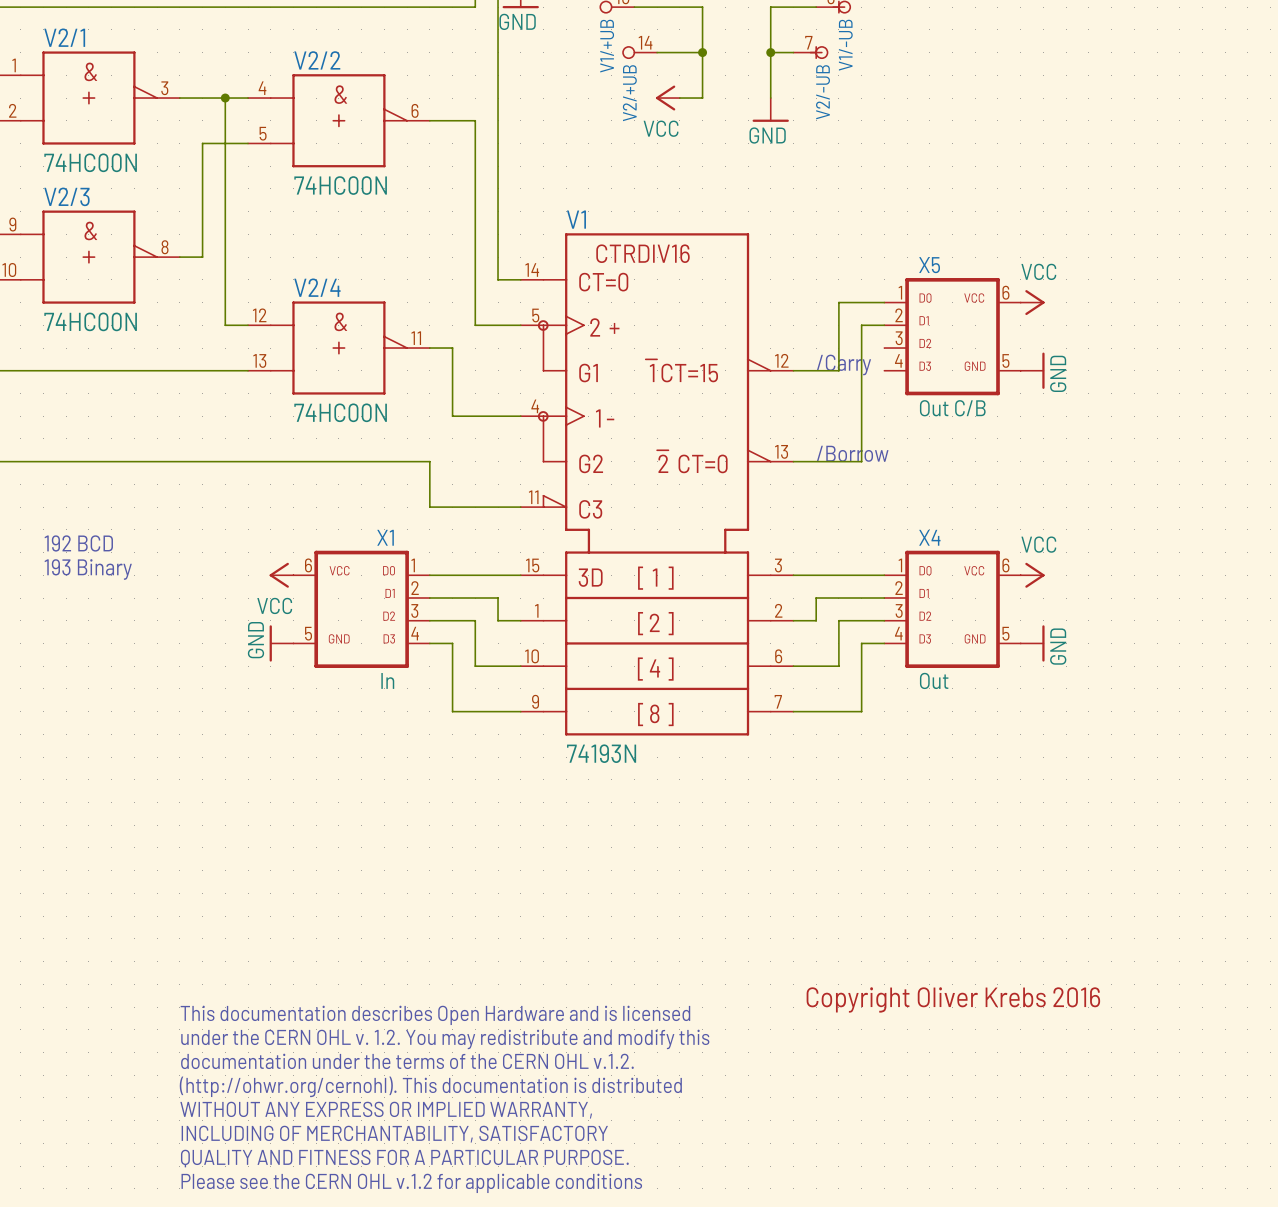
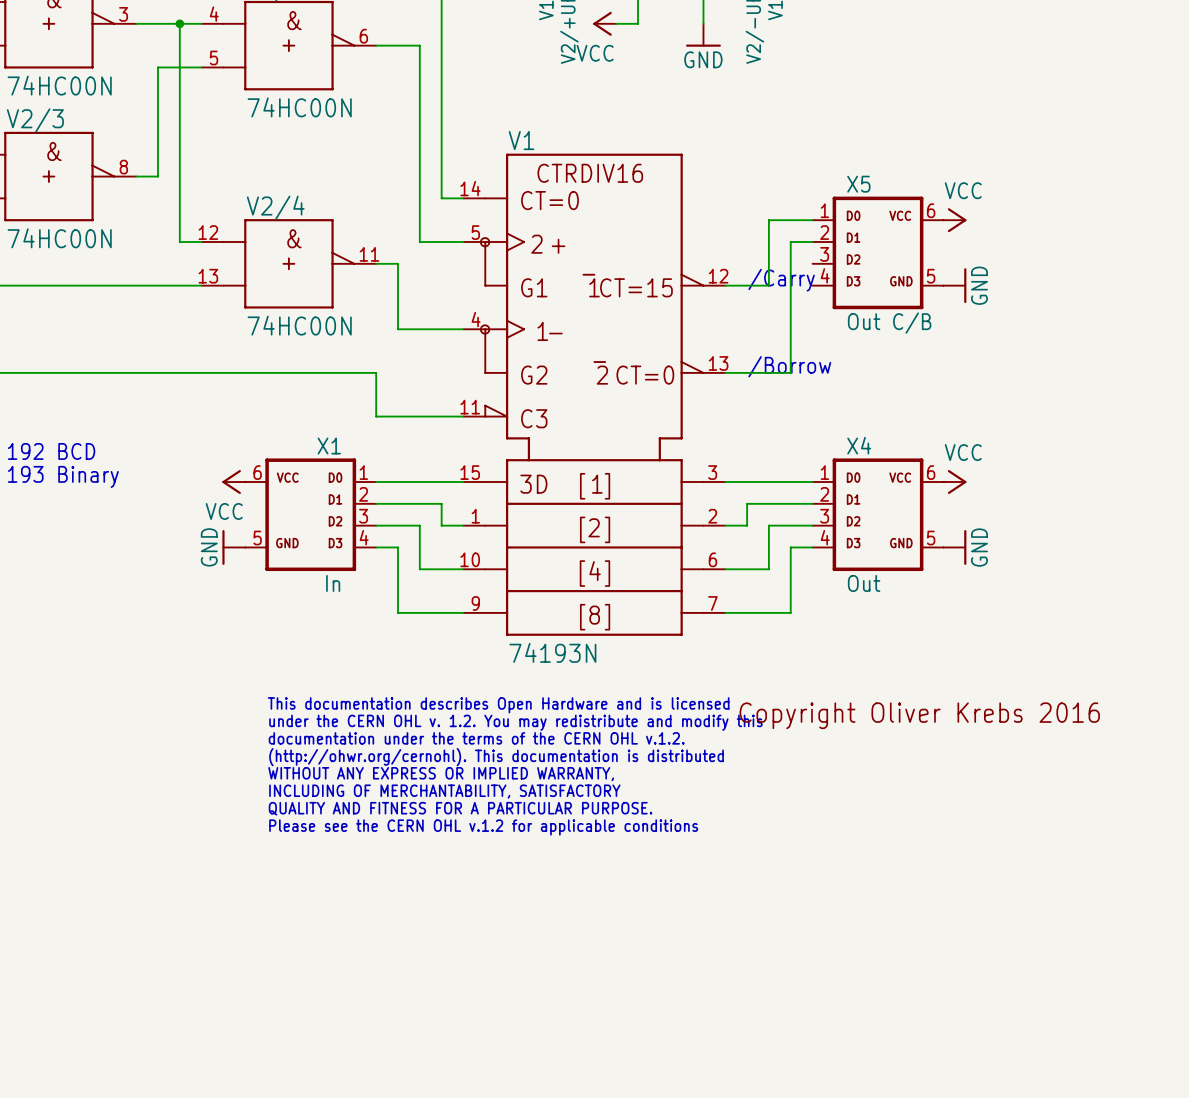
text: none -> This documentation describes Open Hardware and is licensed (498, 705)
text: none -> under the CERN OHL v. 1.2. You may redistribute and modify this (515, 722)
text: none -> documentation under the terms of the CERN OHL v.1.2. (476, 738)
text: none -> (http://ohwr.org/cernohl). This documentation is distributed (496, 757)
text: none -> WITHOUT ANY EXPRESS OR IMPLIED WARRANTY, (441, 774)
text: none -> INCLUDING OF MERCHANTABILITY, SATISFACTORY (444, 791)
text: none -> QUALITY AND FITNESS FOR A PARTICULAR PURPOSE. (460, 808)
text: none -> Please see the CERN OHL v.1.2 for applicable conditions (483, 827)
text position: Copyright Oliver Krebs 2016 (953, 999) -> Copyright Oliver Krebs 2016 (919, 715)
text: This documentation describes Open Hardware and is licensed (435, 1015) -> none
text: under the CERN OHL v. 1.2. You may redistribute and modify this (445, 1039) -> none
text: documentation under the terms of the CERN OHL v.1.2. (407, 1061) -> none
text: (http://ohwr.org/cernohl). This documentation is distributed (430, 1086) -> none
text: WITHOUT ANY EXPRESS OR IMPLIED WARRANTY, (386, 1110) -> none
text: INCLUDING OF MERCHANTABILITY, SATISFACTORY (394, 1134) -> none
text: QUALITY AND FITNESS FOR A PARTICULAR PURPOSE. (404, 1158) -> none
text: Please see the CERN OHL v.1.2 for applicable conditions (411, 1183) -> none

